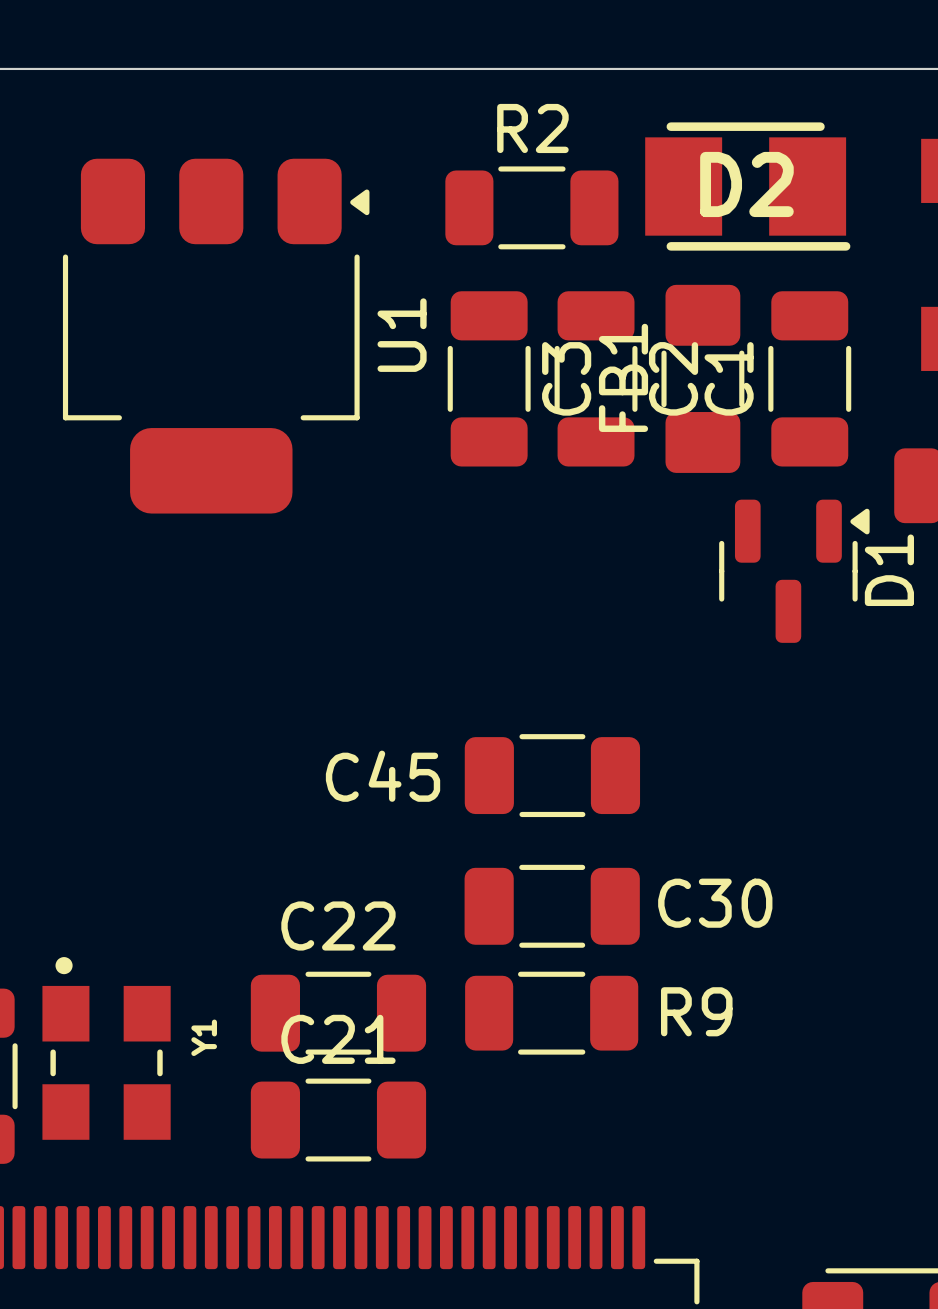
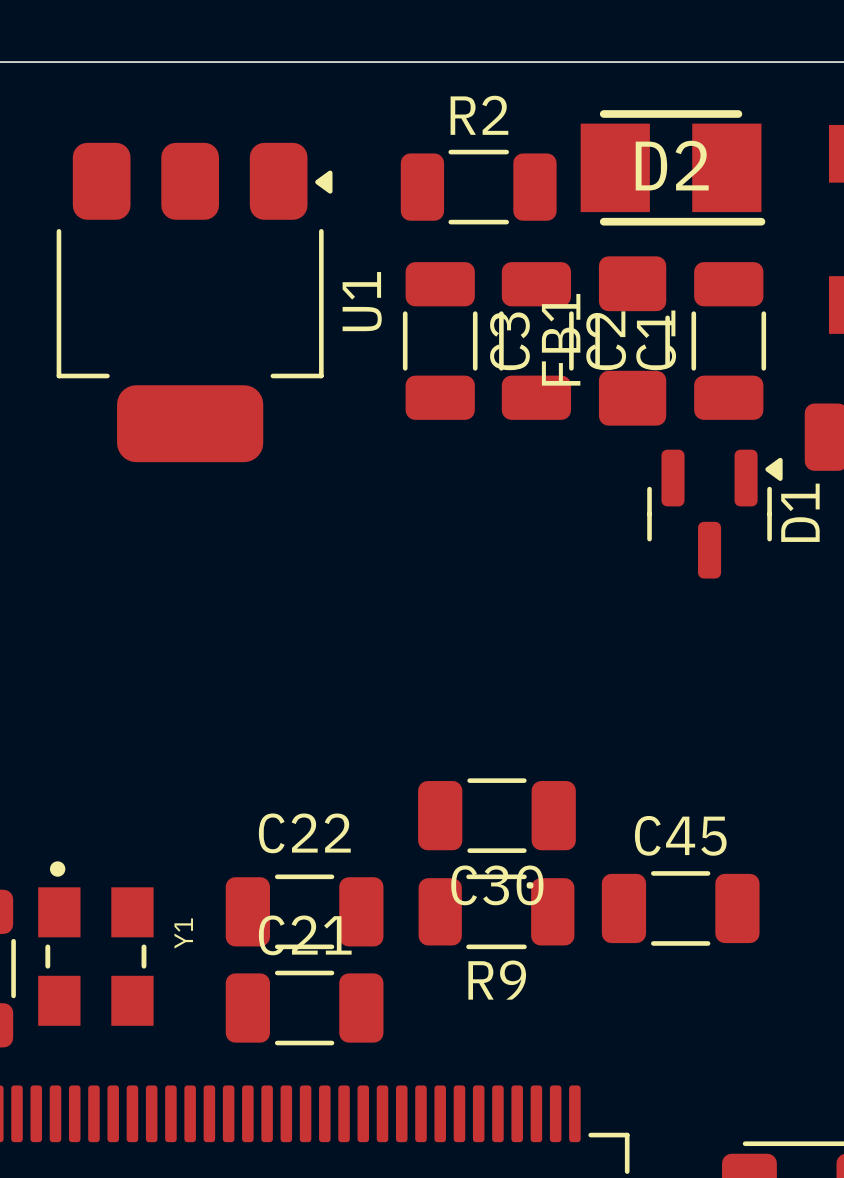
C45 position: (552, 775) -> (680, 908)
C45 name position: C45 (383, 776) -> C45 (680, 835)
C30 name position: C30 (715, 903) -> C30 (497, 885)
R9 name position: R9 (696, 1011) -> R9 (497, 980)

